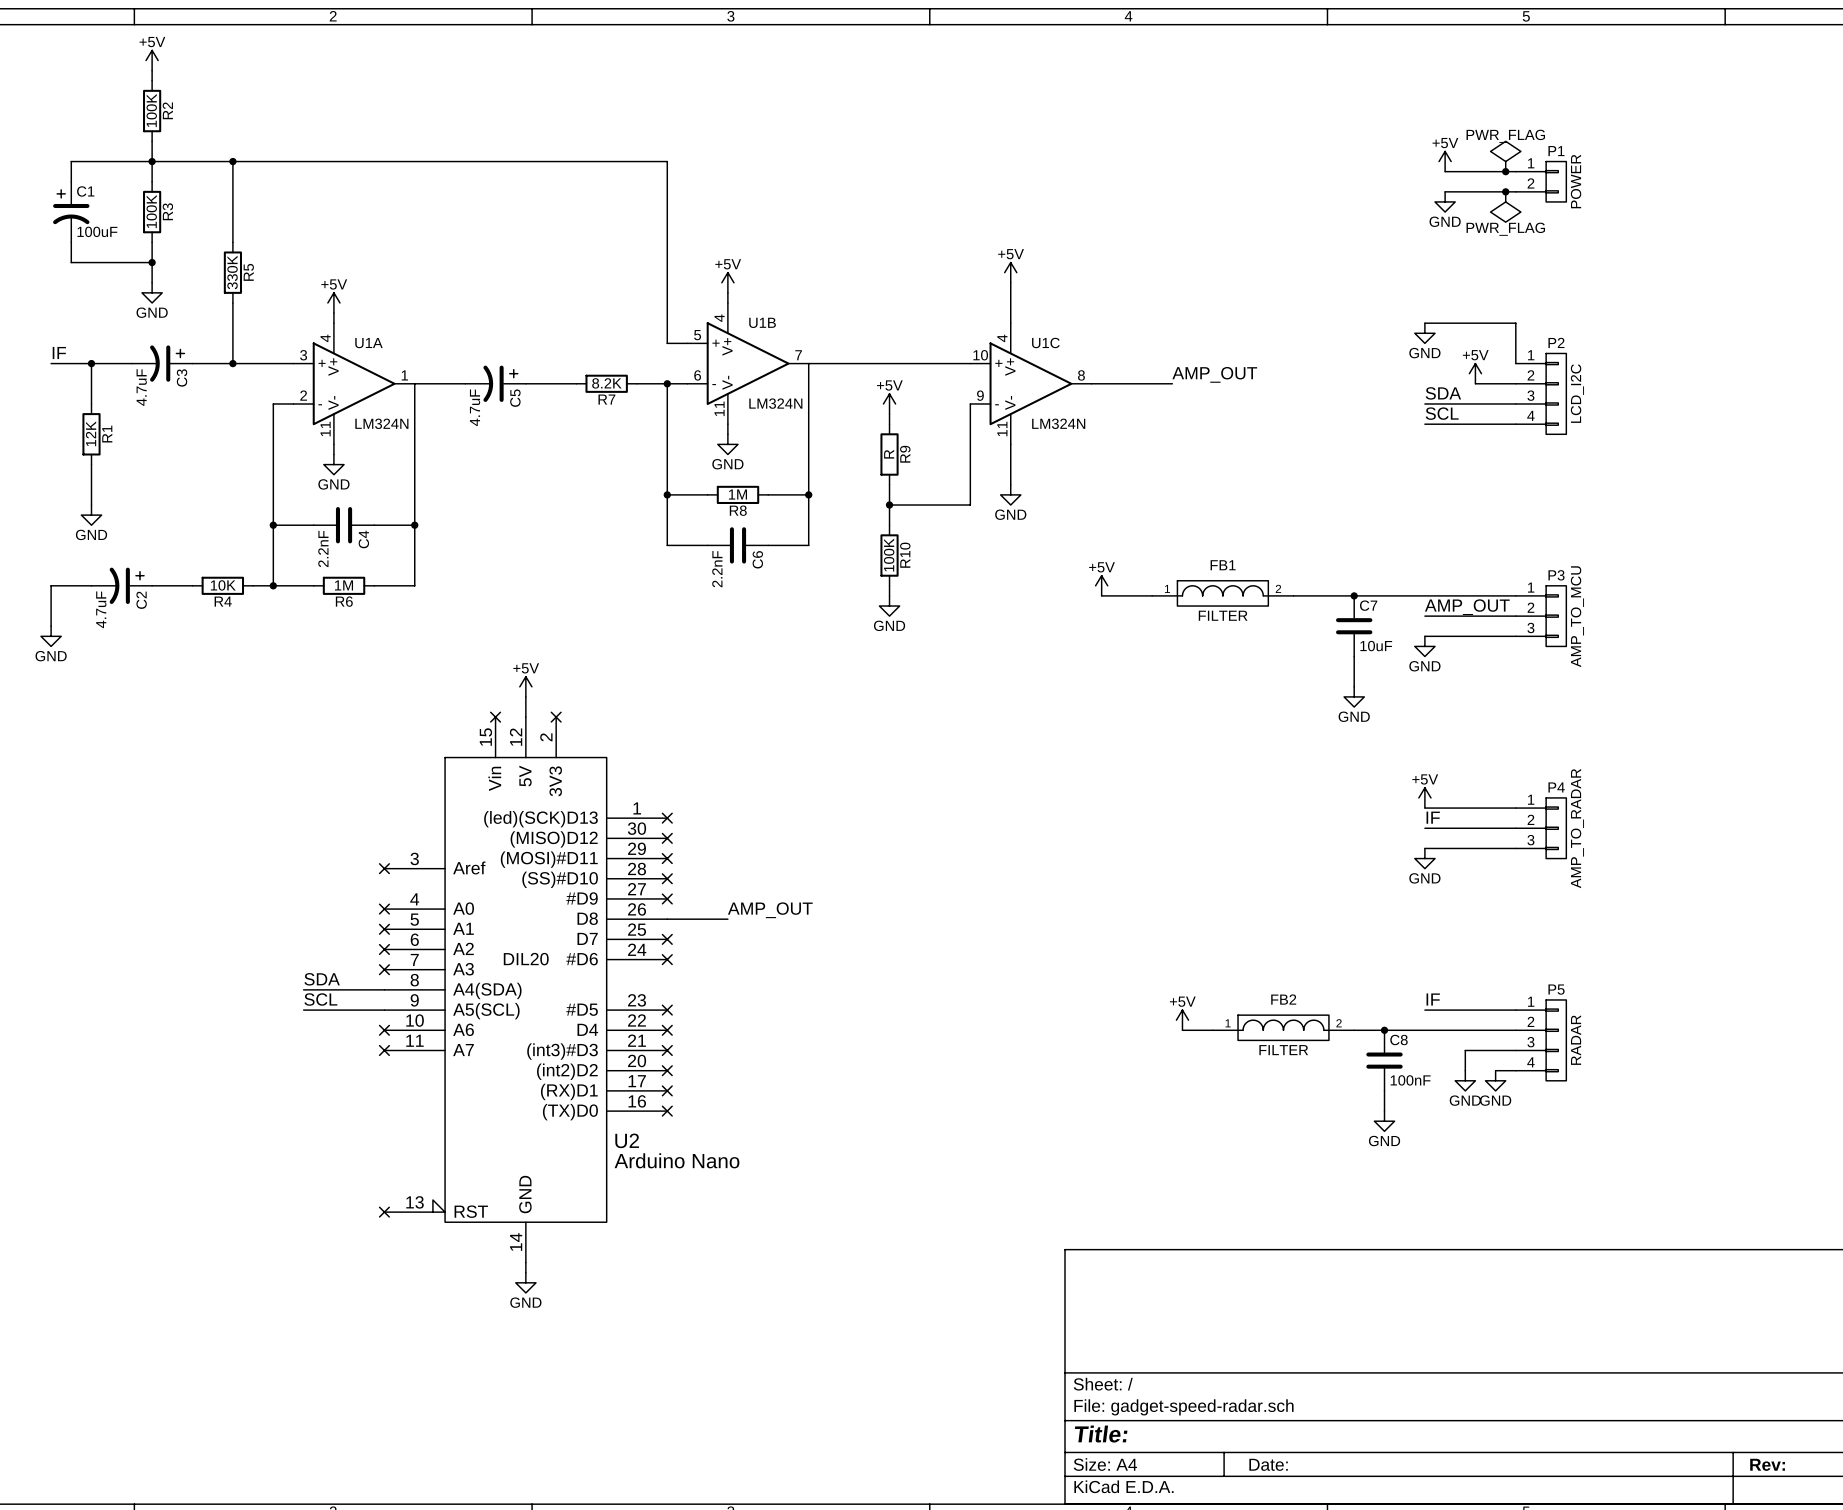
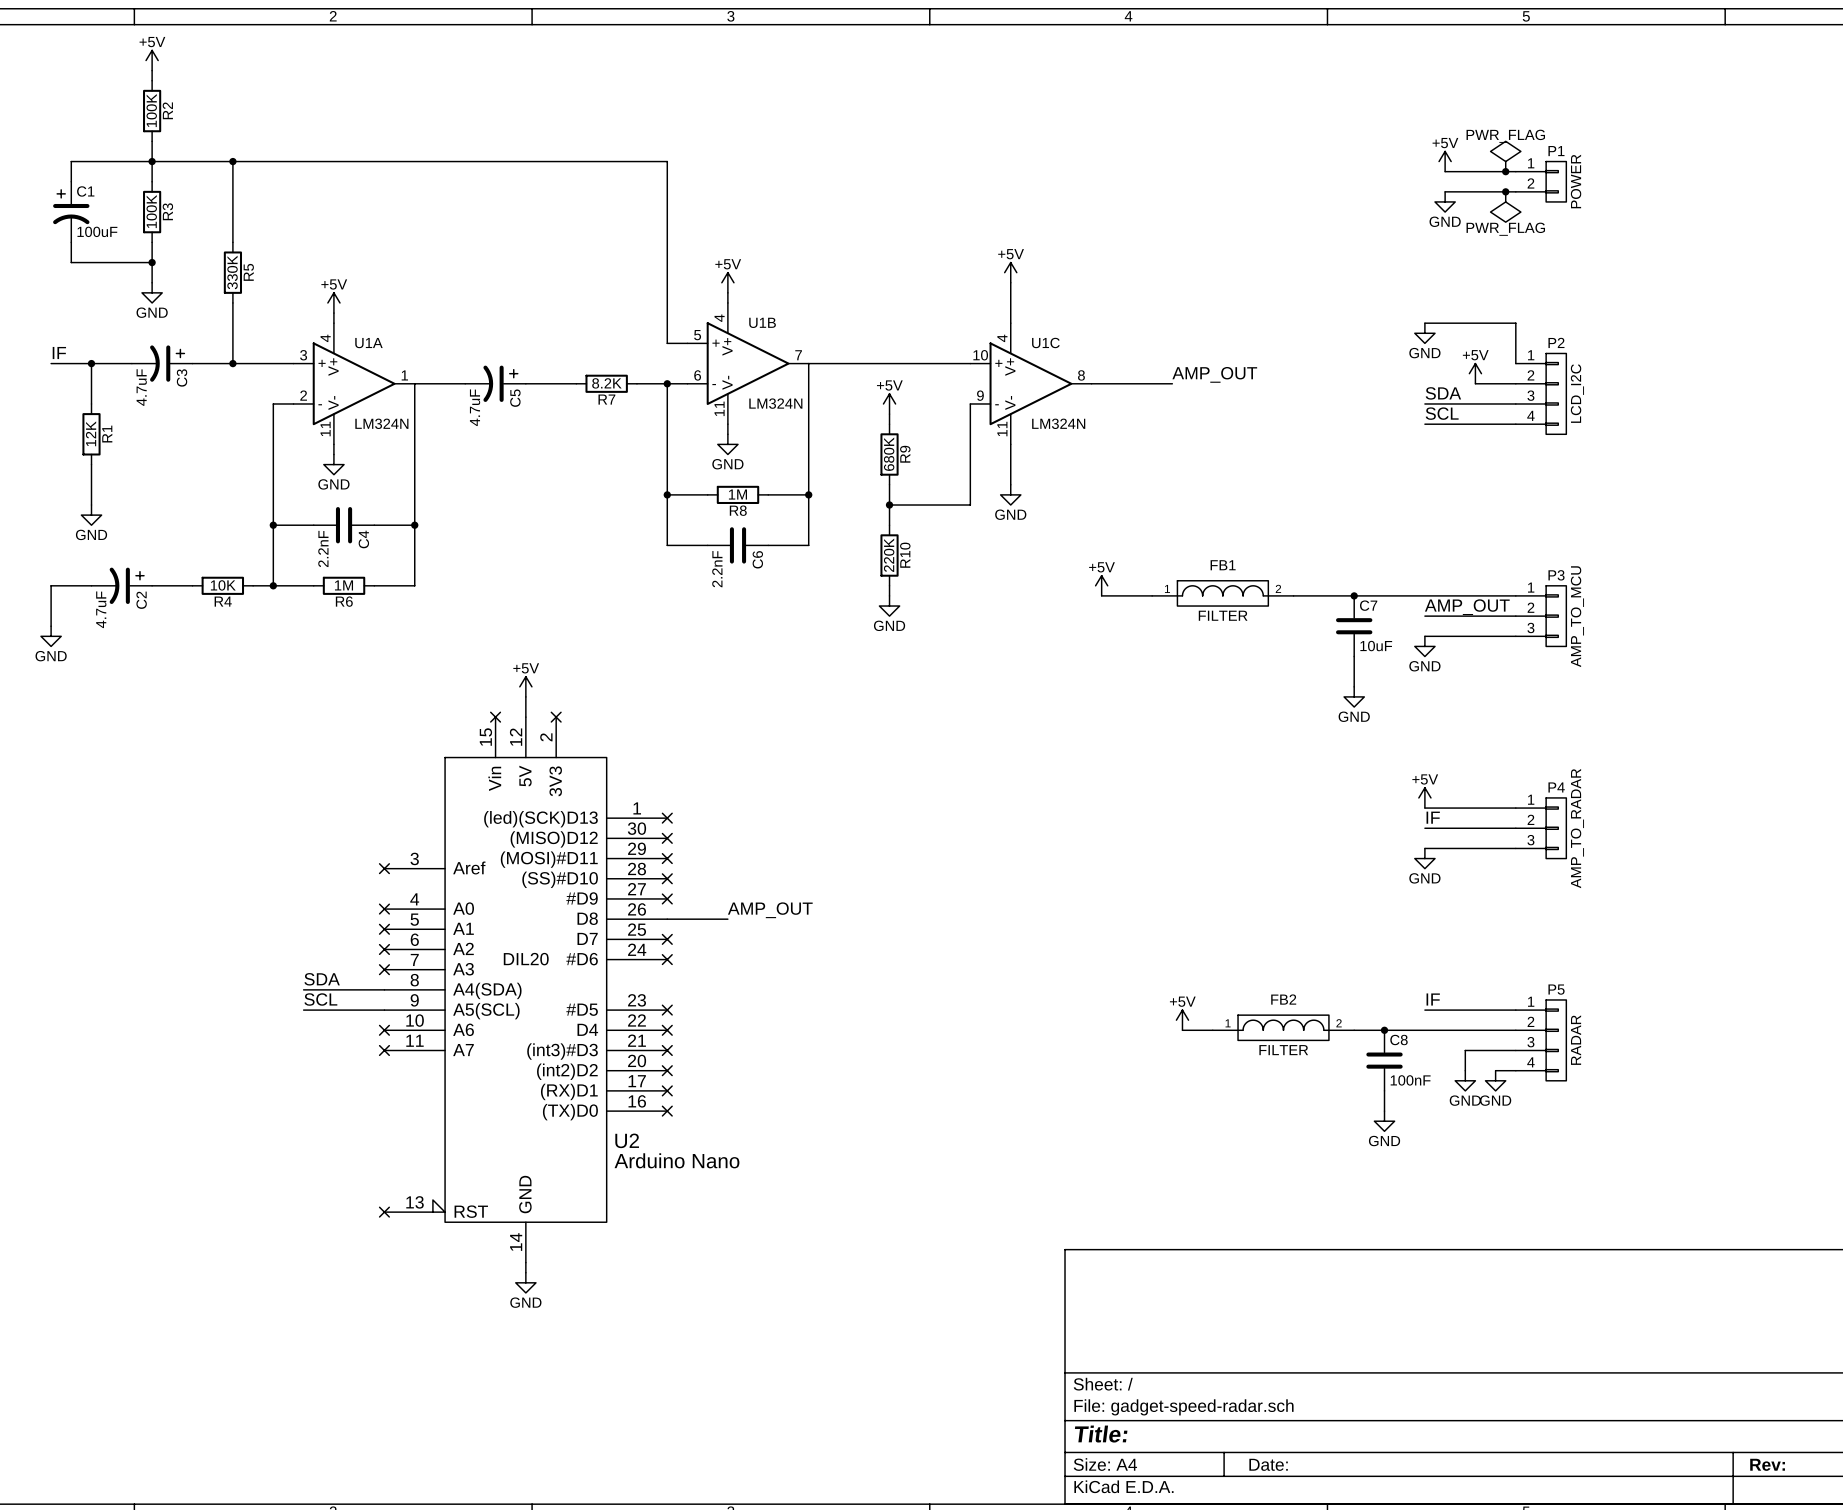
R9 value: R (889, 454) -> 680K (889, 454)
R10 value: 100K (889, 555) -> 220K (889, 555)

